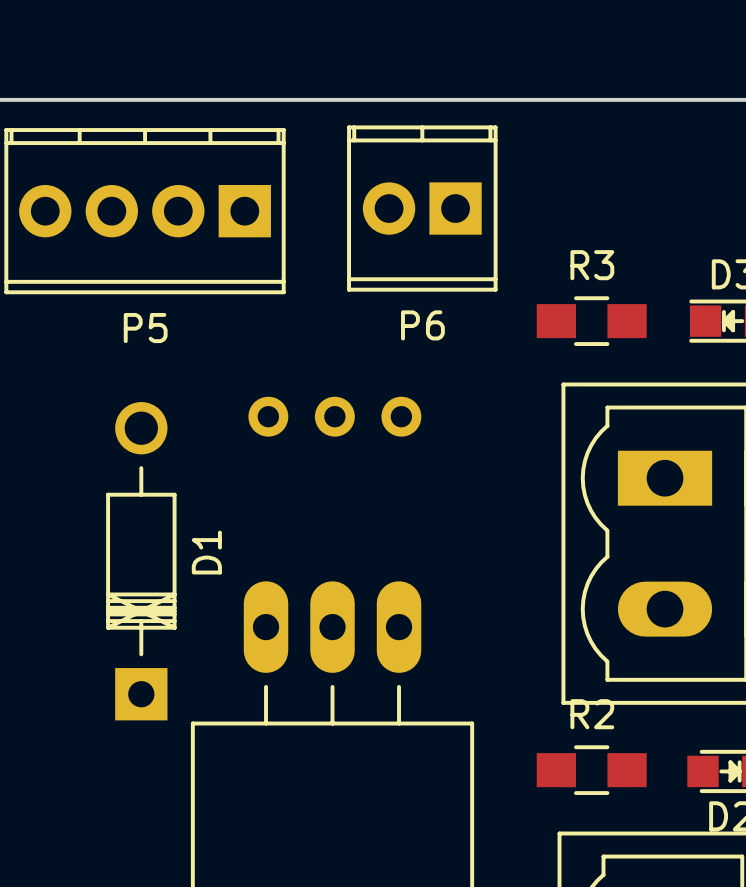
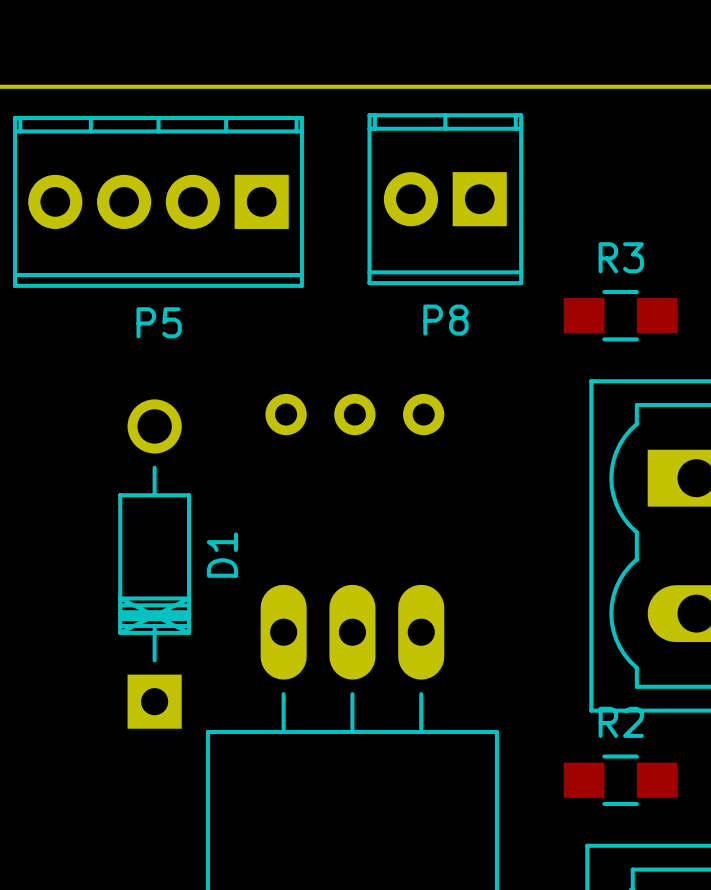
P6 name: P6 (422, 325) -> P8 (445, 320)

